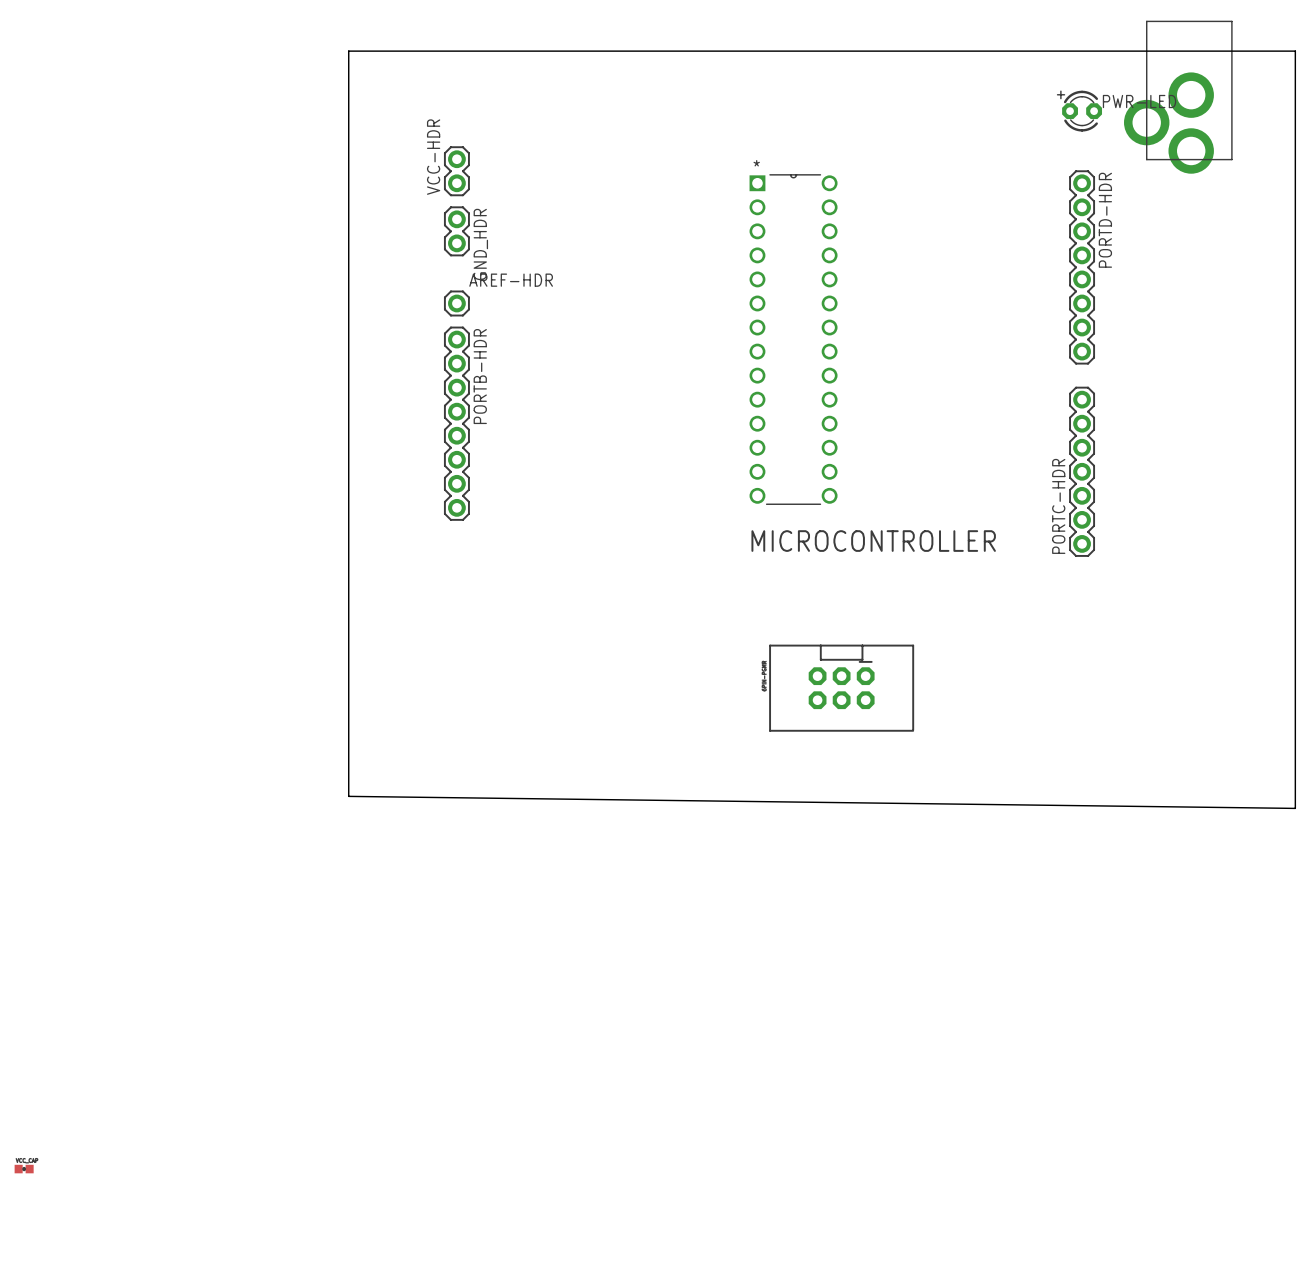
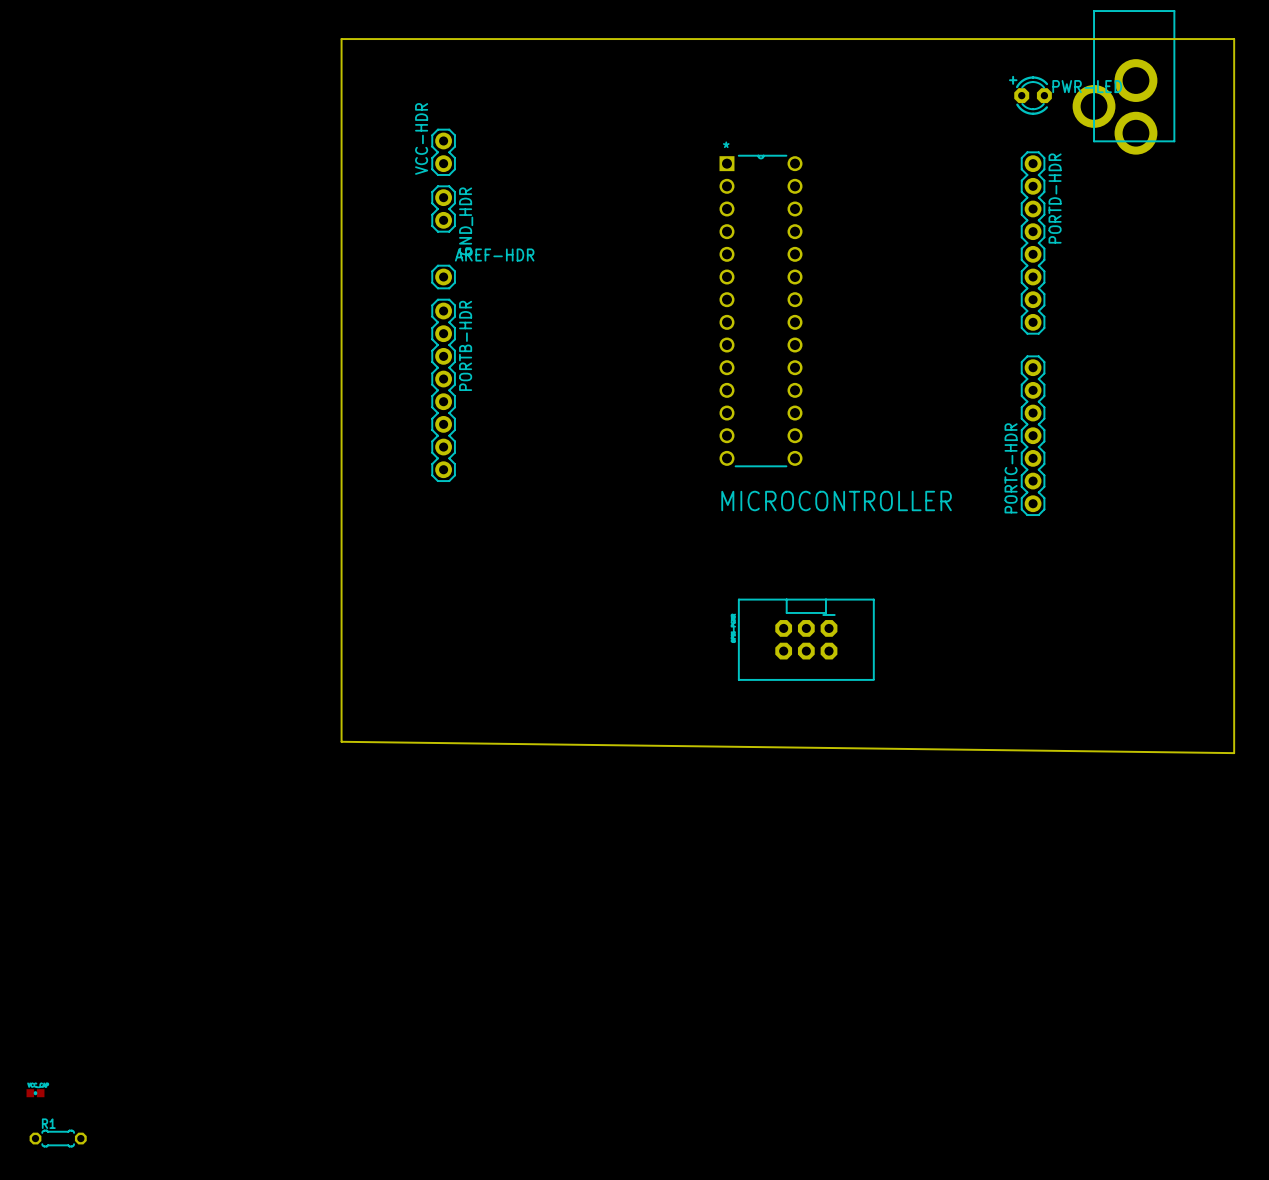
R1: none -> (58, 1138)

